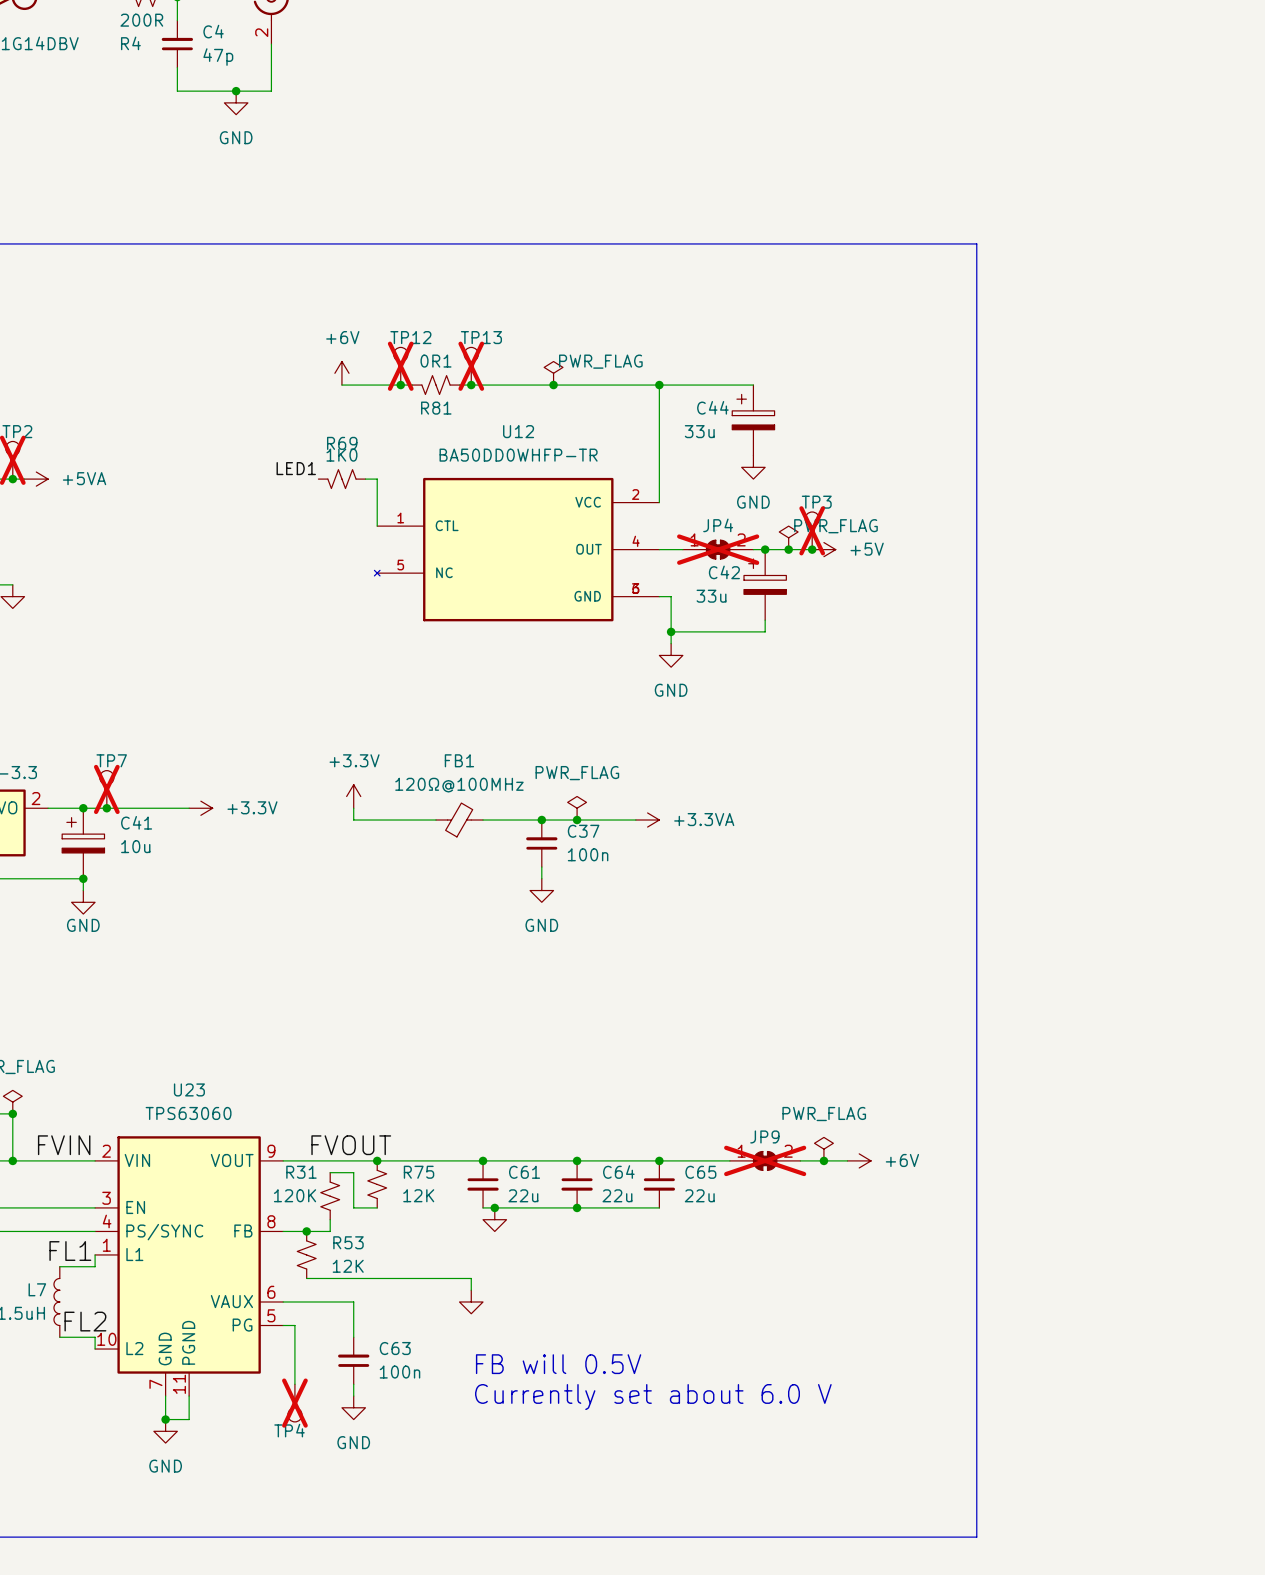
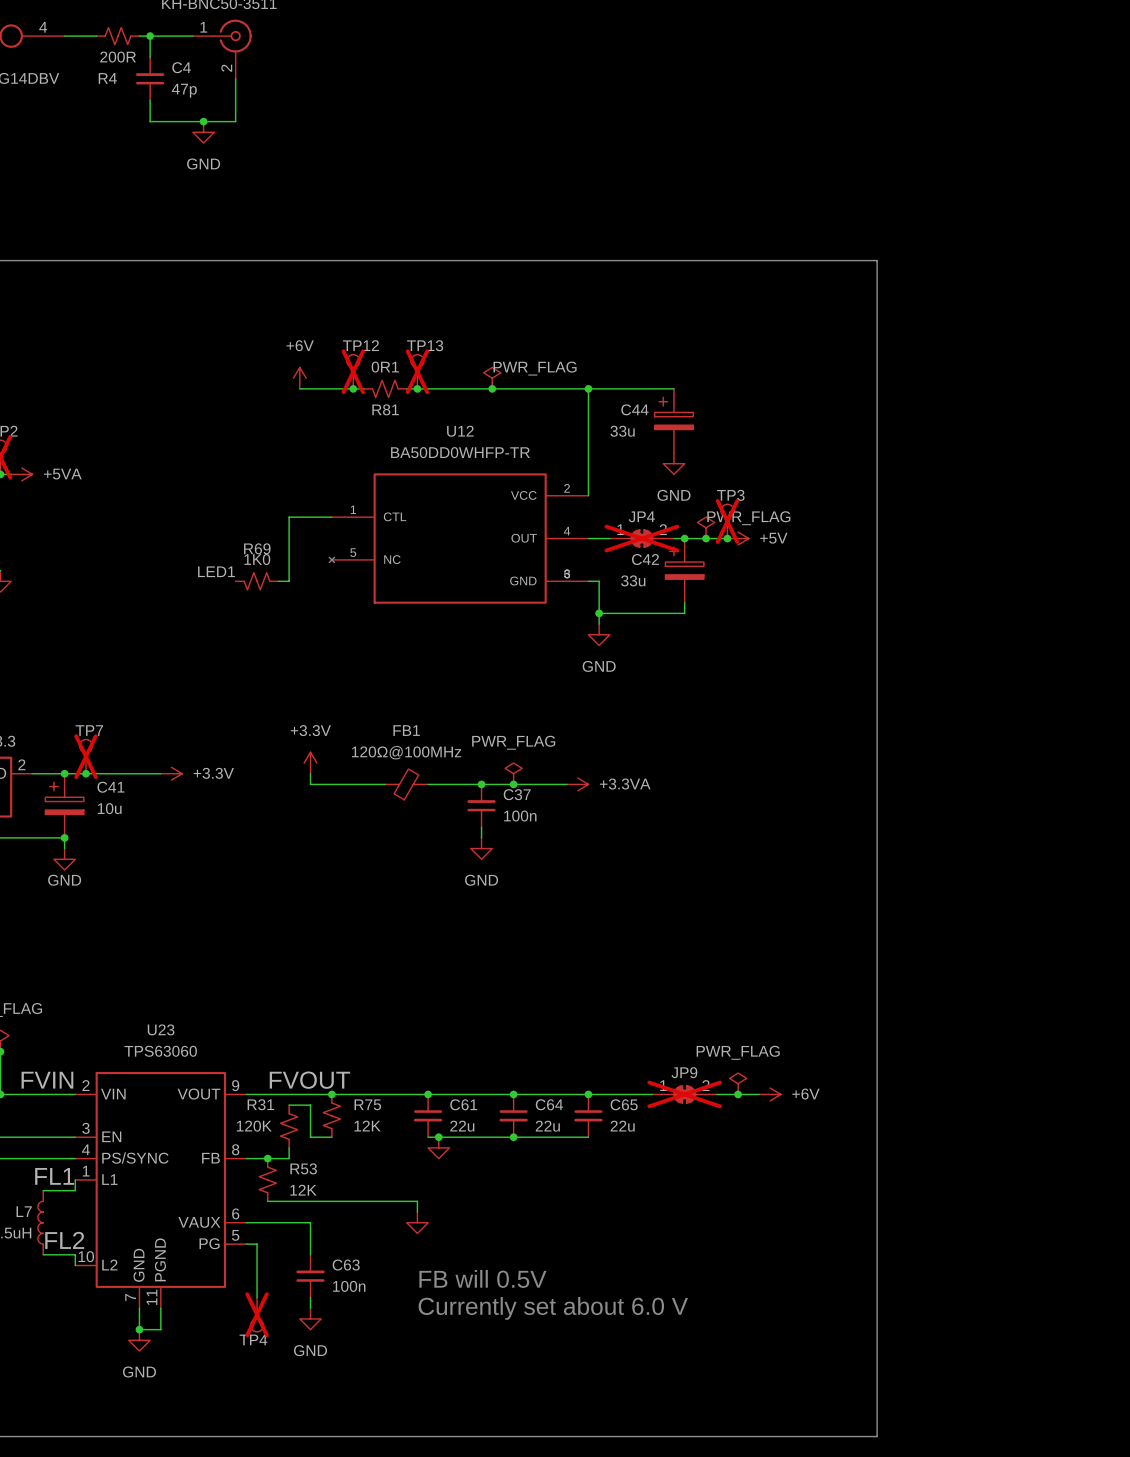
label position: LED1 (296, 468) -> LED1 (216, 571)
R69 position: (341, 479) -> (257, 581)
wire: (365, 479) (377, 479) (377, 526) -> (278, 581) (289, 581) (289, 517) (331, 517)

